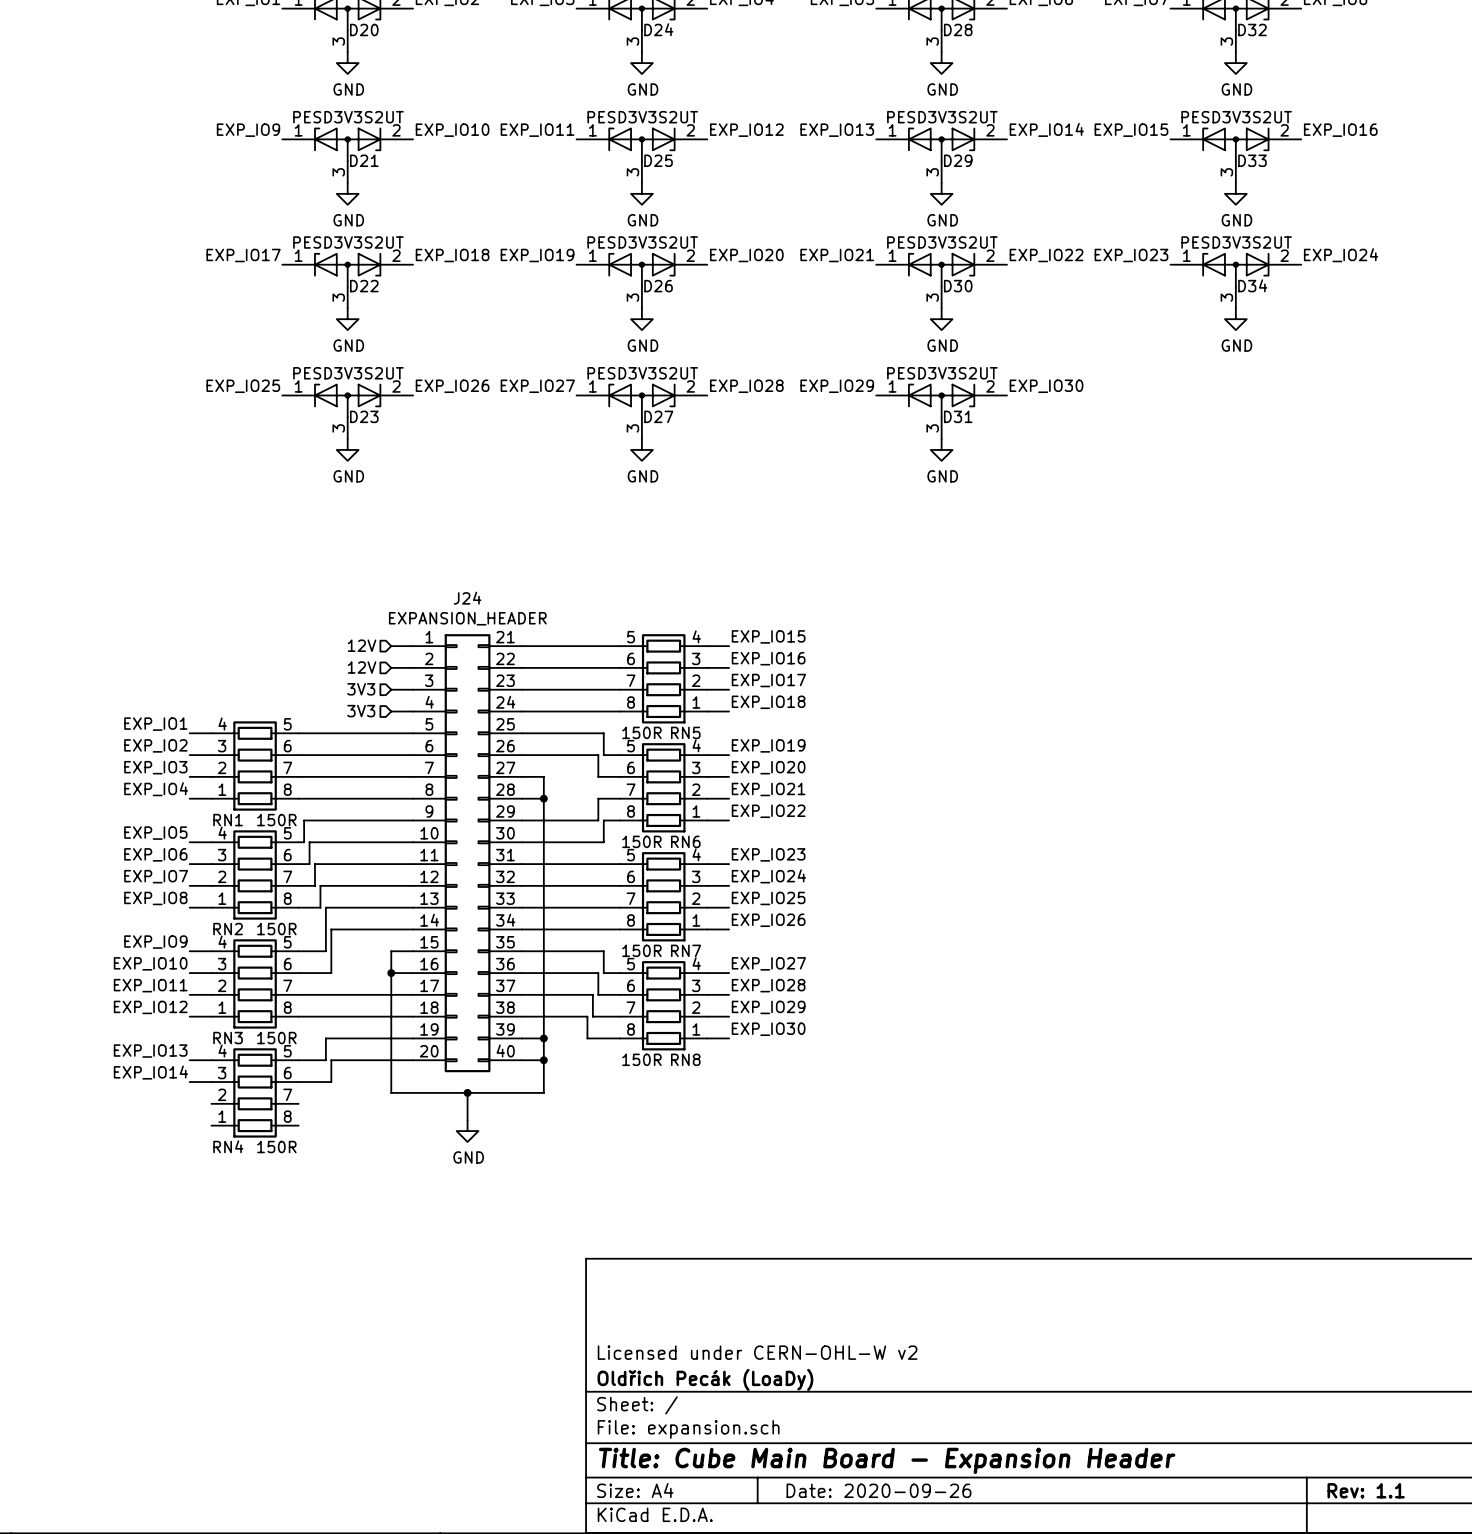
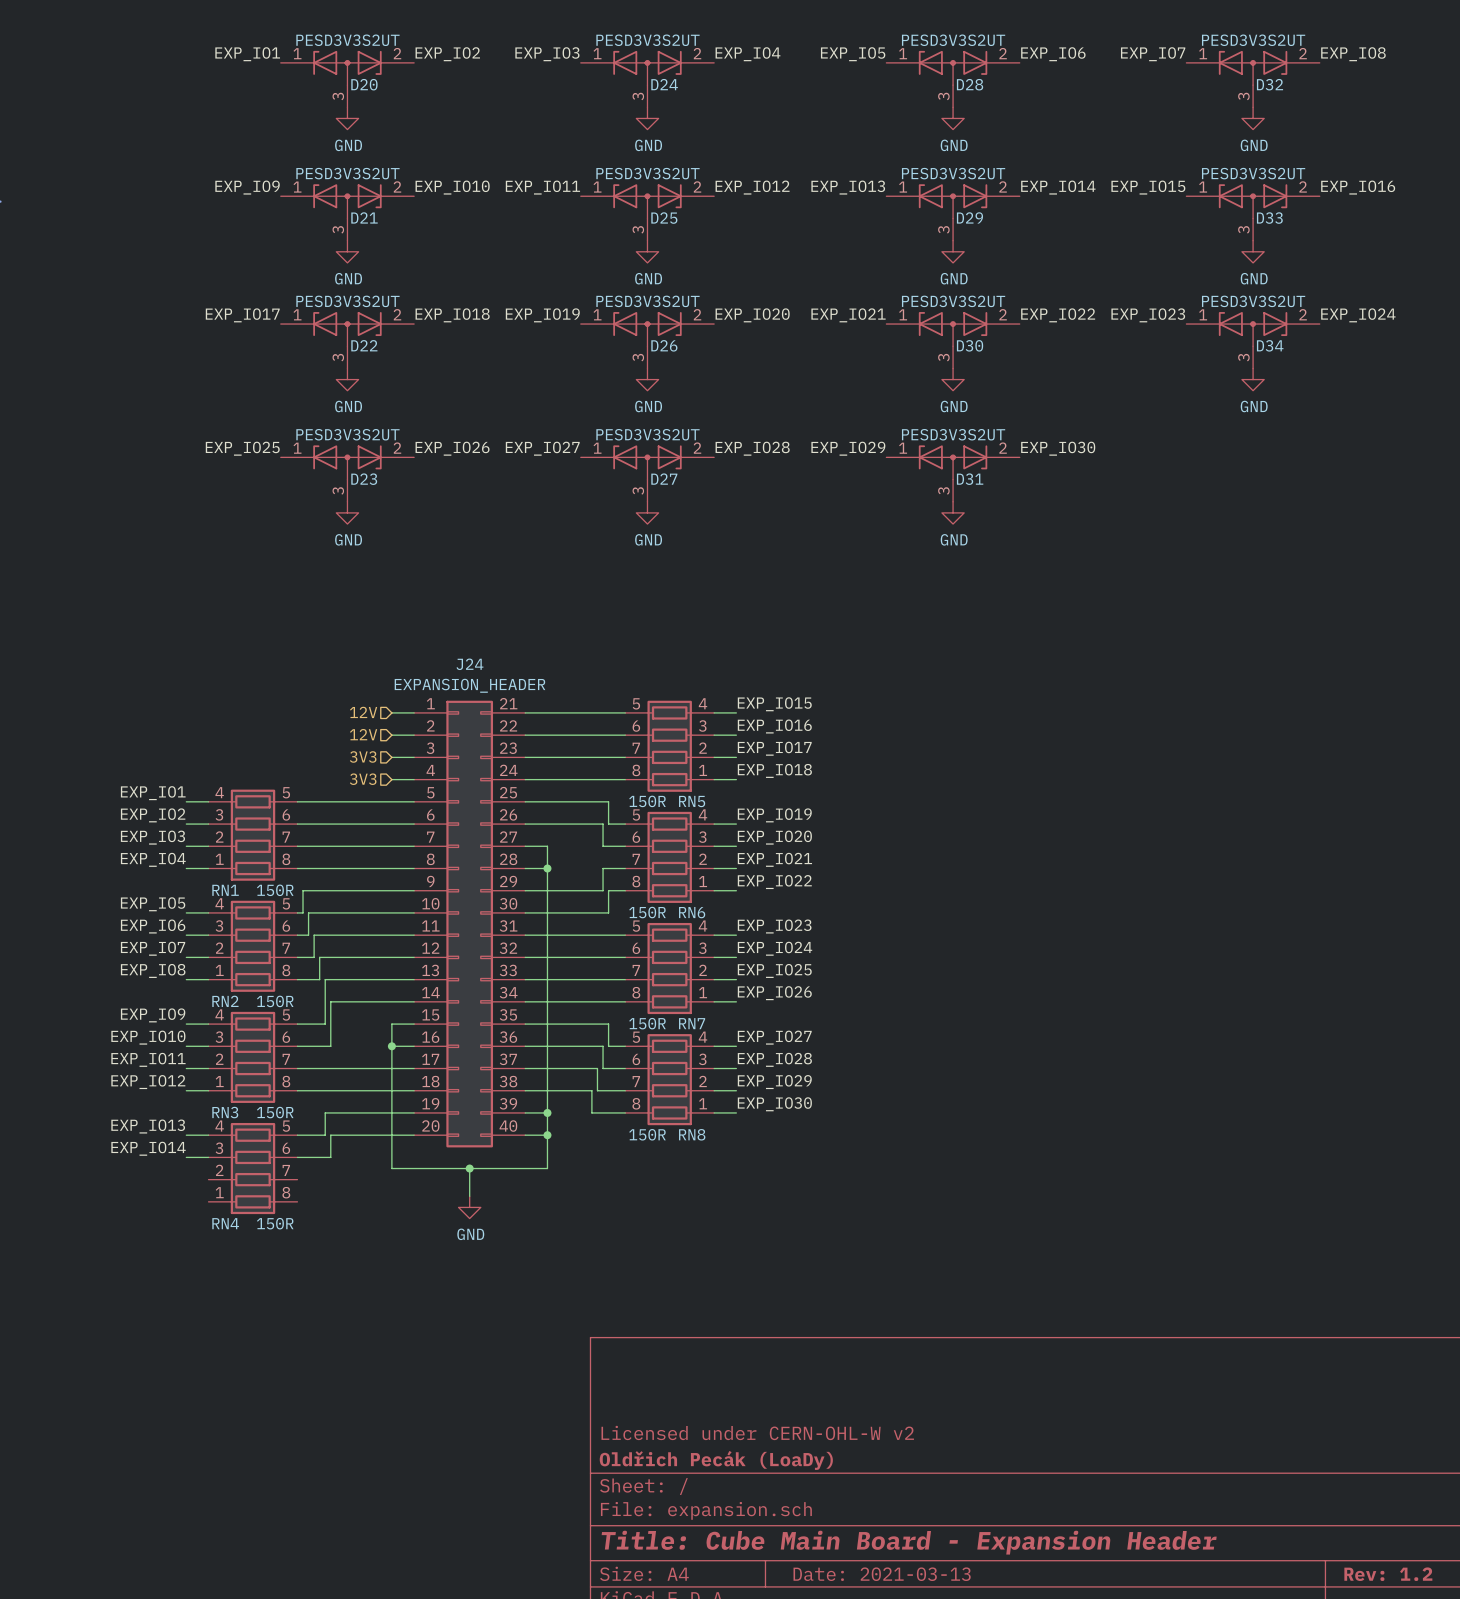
title block: Date: 2020-09-26 (878, 1490) -> Date: 2021-03-13 (882, 1574)
title block: Rev: 1.1 (1366, 1490) -> Rev: 1.2 (1388, 1574)

